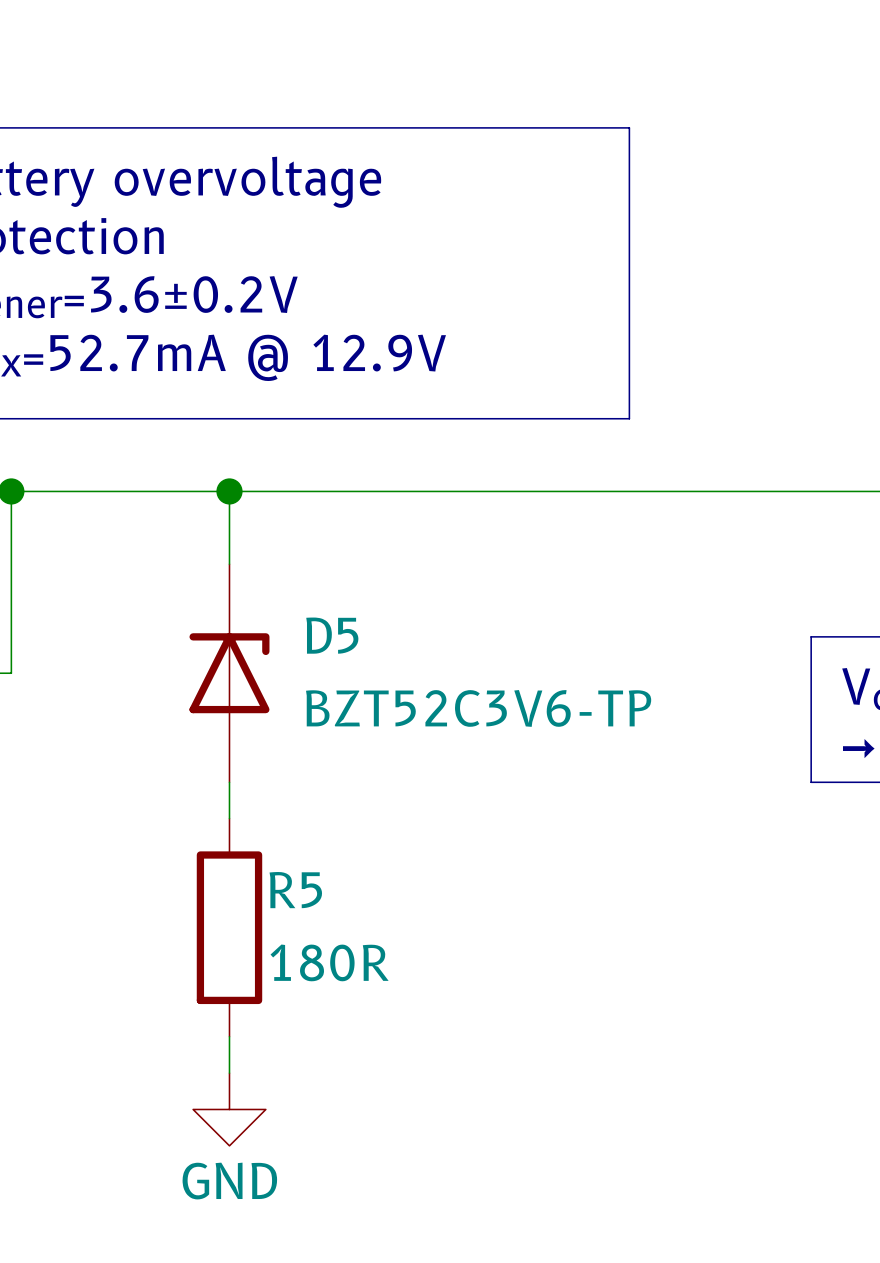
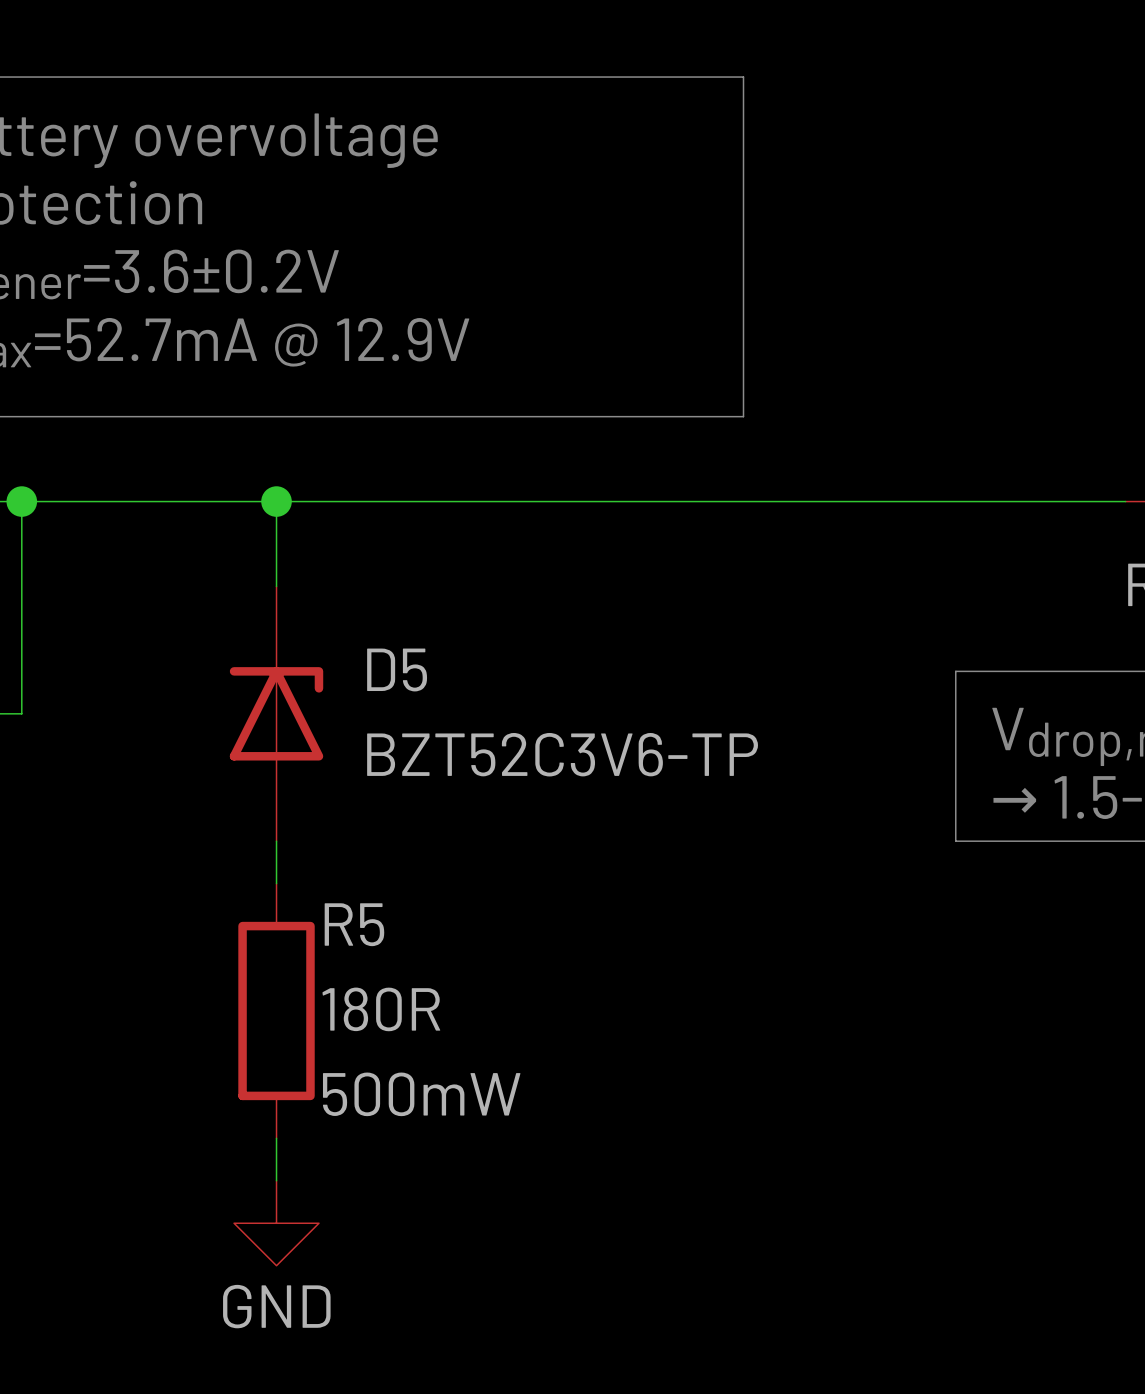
R5 name position: R5 (295, 890) -> R5 (354, 924)
R5 value position: 180R (329, 962) -> 180R (381, 1009)
R5 text: none -> 500mW (421, 1094)

